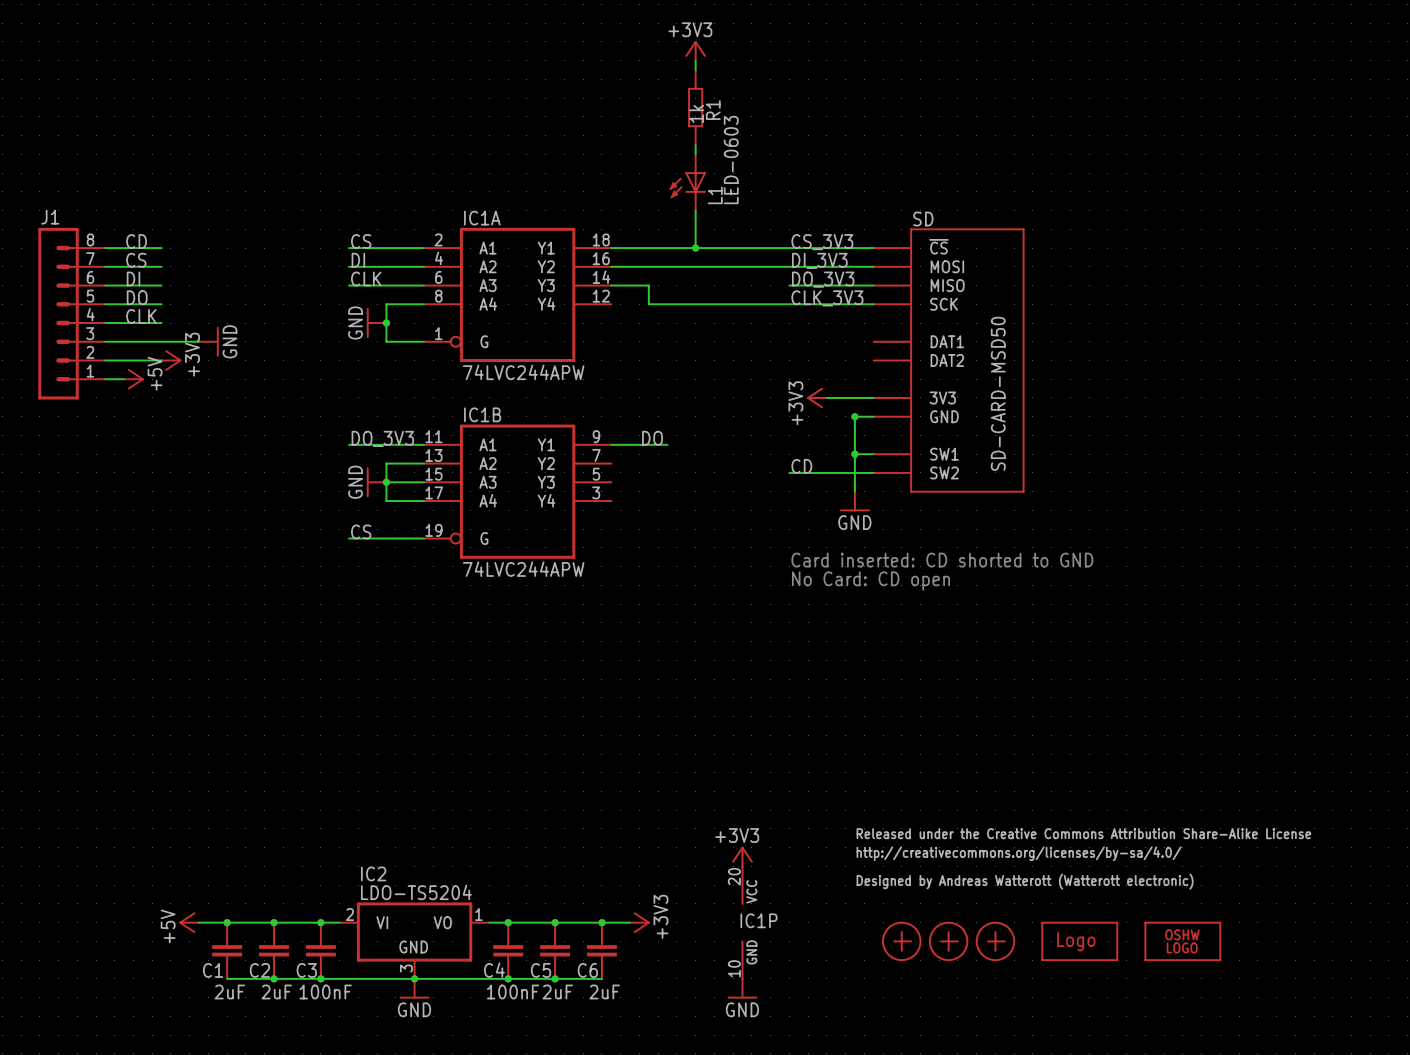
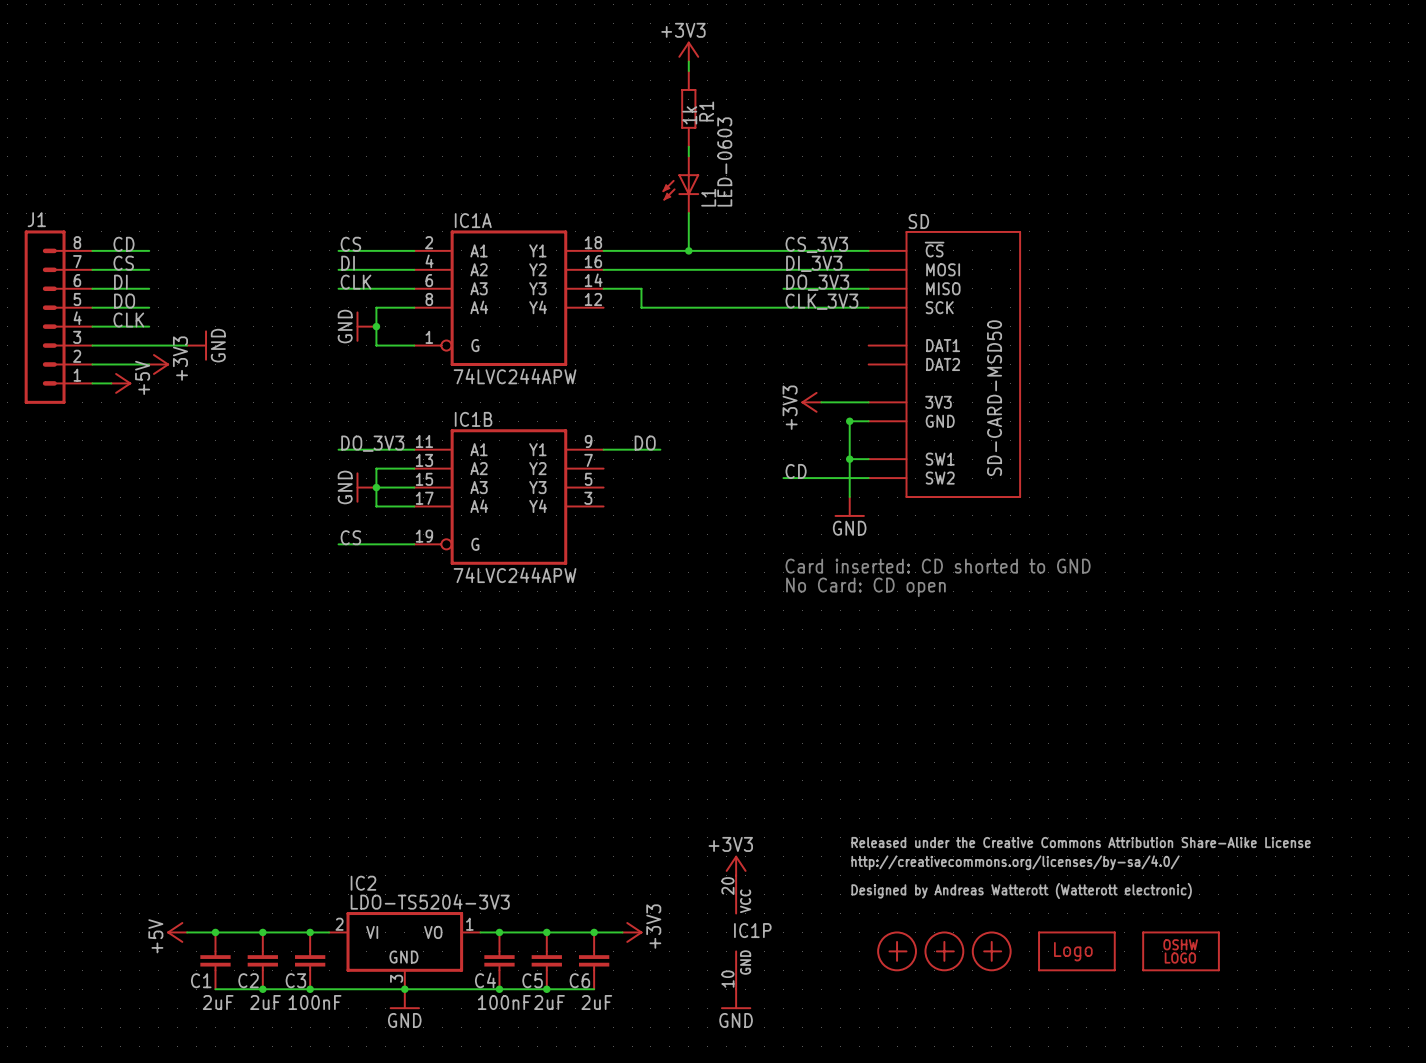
IC2 value: LDO-TS5204 (416, 892) -> LDO-TS5204-3V3 (430, 901)

